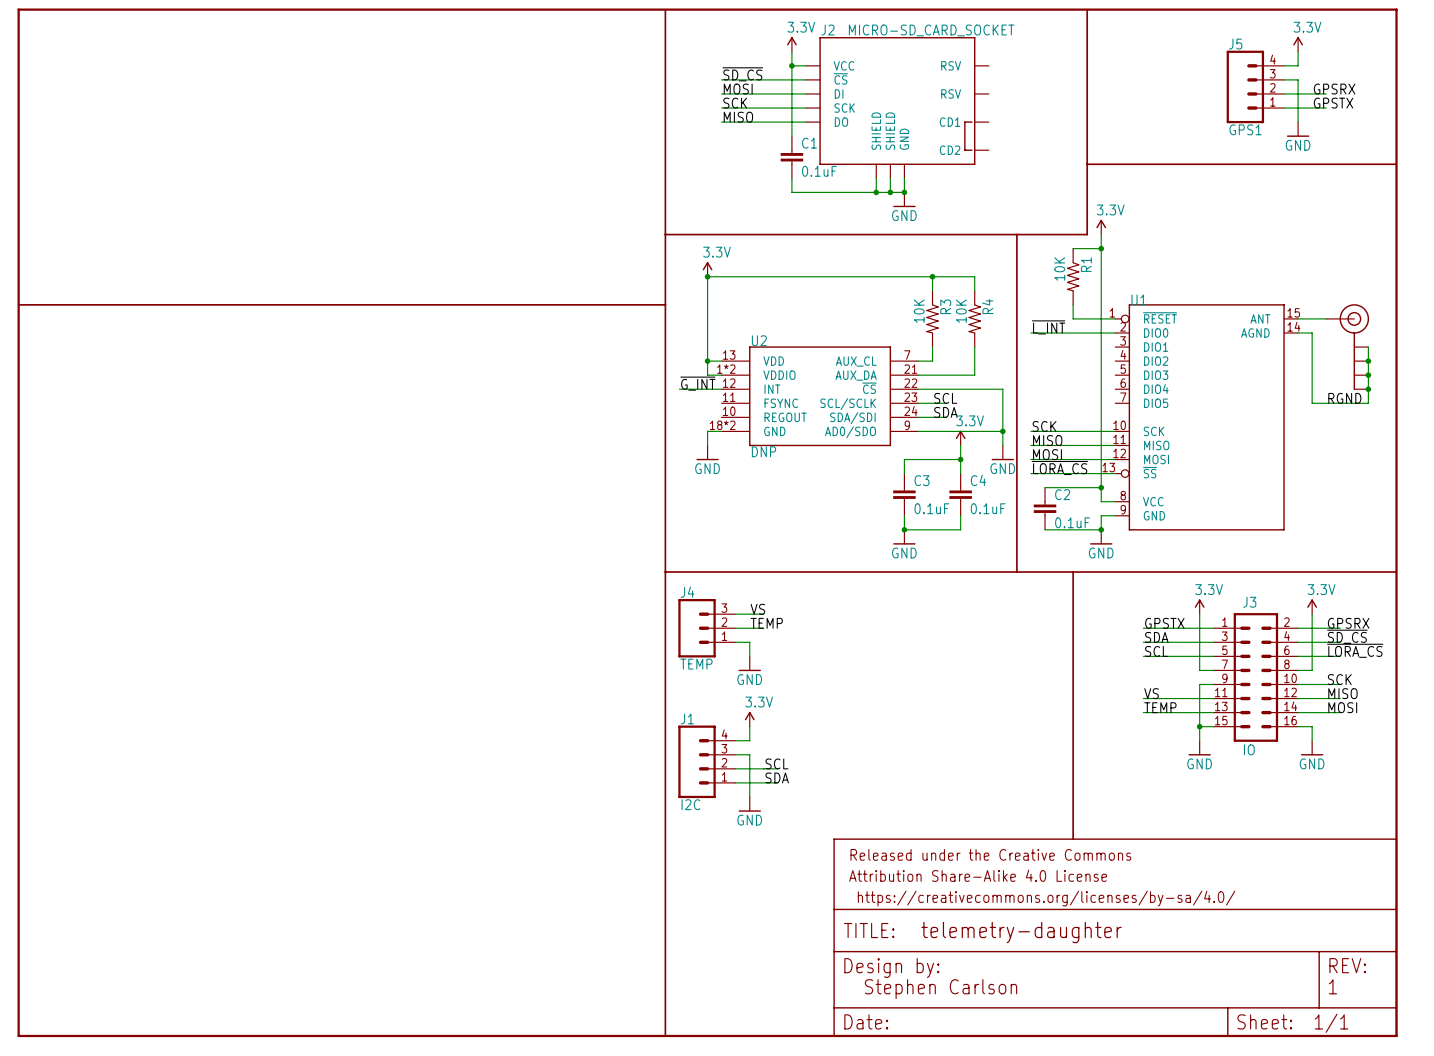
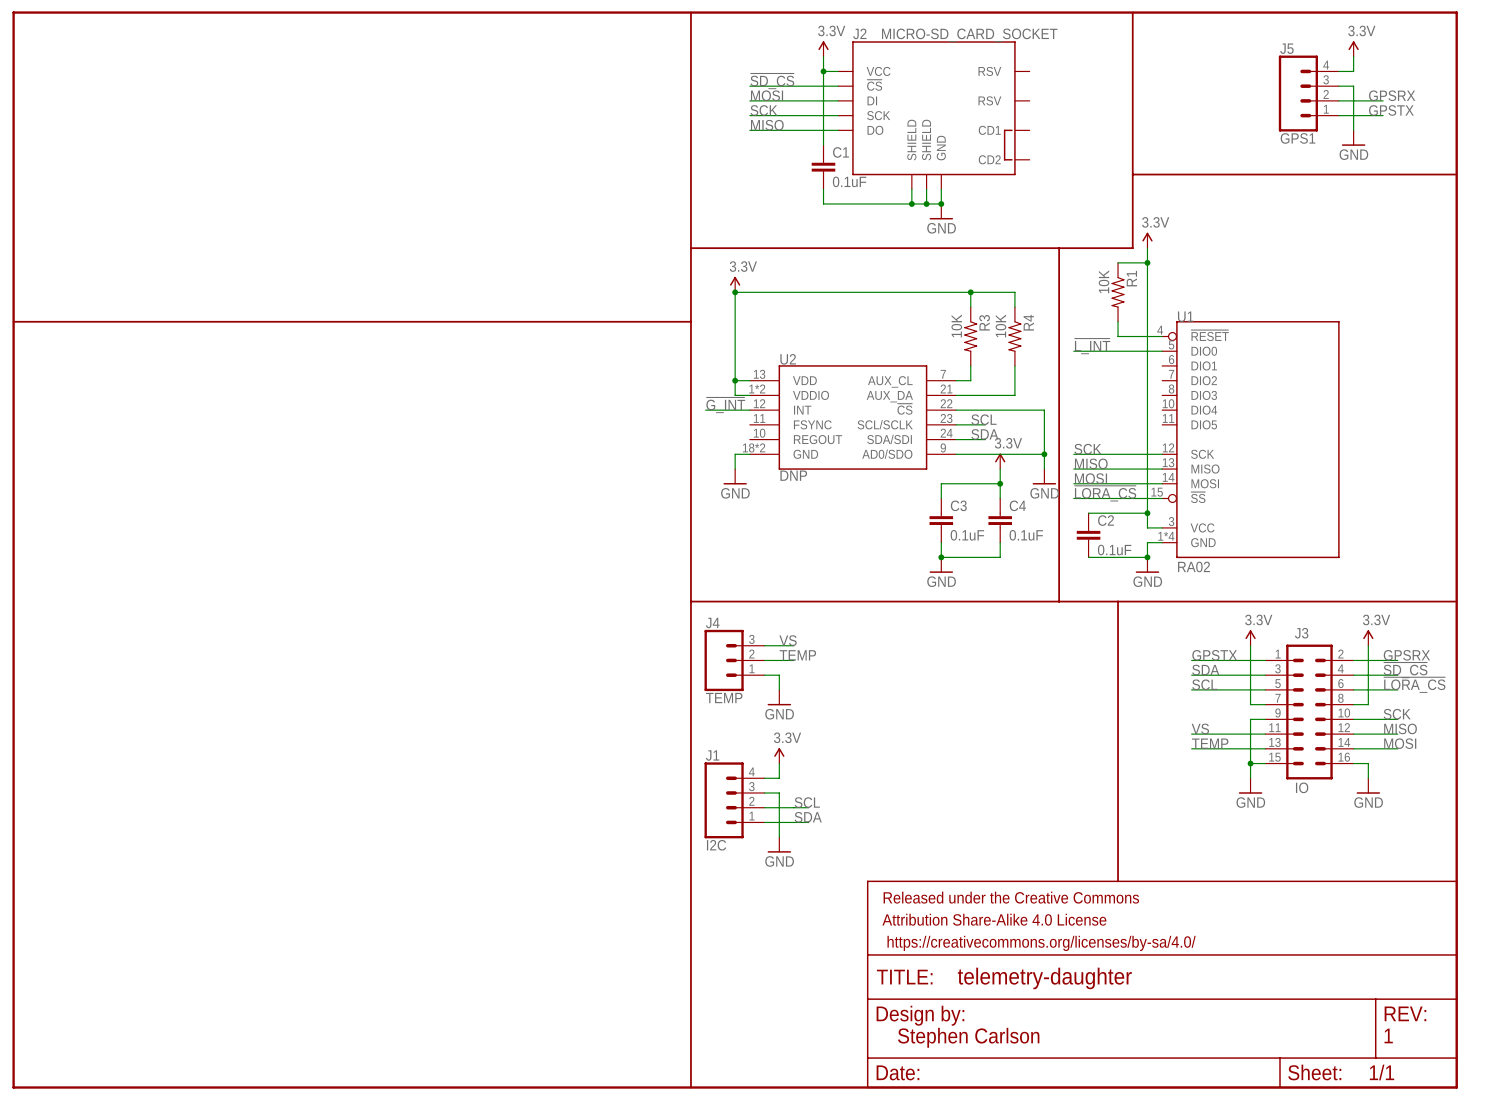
U1 symbol: [1115, 304, 1299, 531] -> [1162, 321, 1340, 559]
wire: (1298, 318) (1326, 318) -> none
wire: (1298, 332) (1312, 332) (1312, 403) (1368, 403) (1368, 347) -> none
part: (1347, 347) -> none
junction: (1368, 361) -> none
junction: (1368, 375) -> none
junction: (1368, 389) -> none
label: RGND (1344, 398) -> none
U1 value: none -> RA02 (1193, 566)

